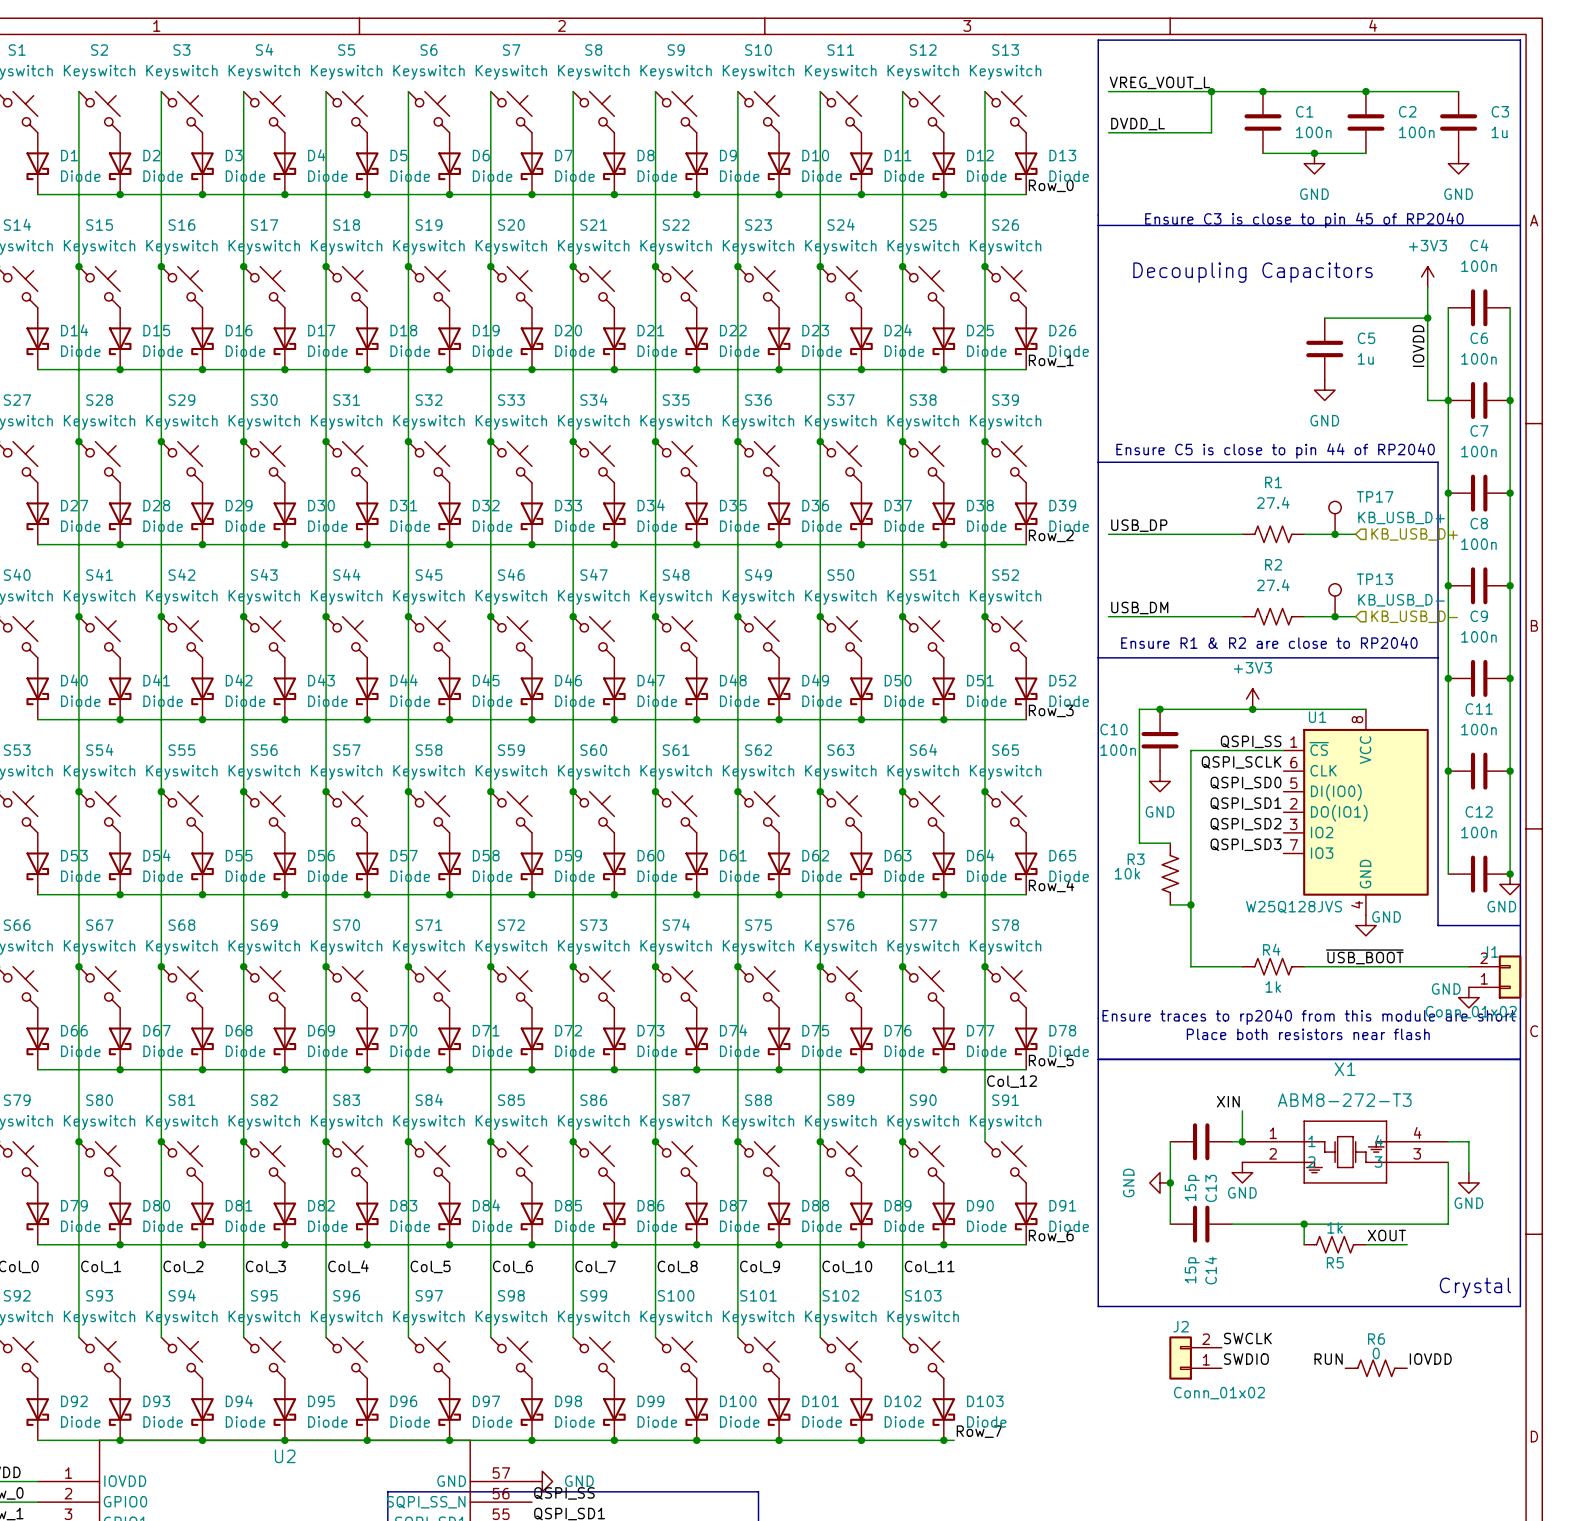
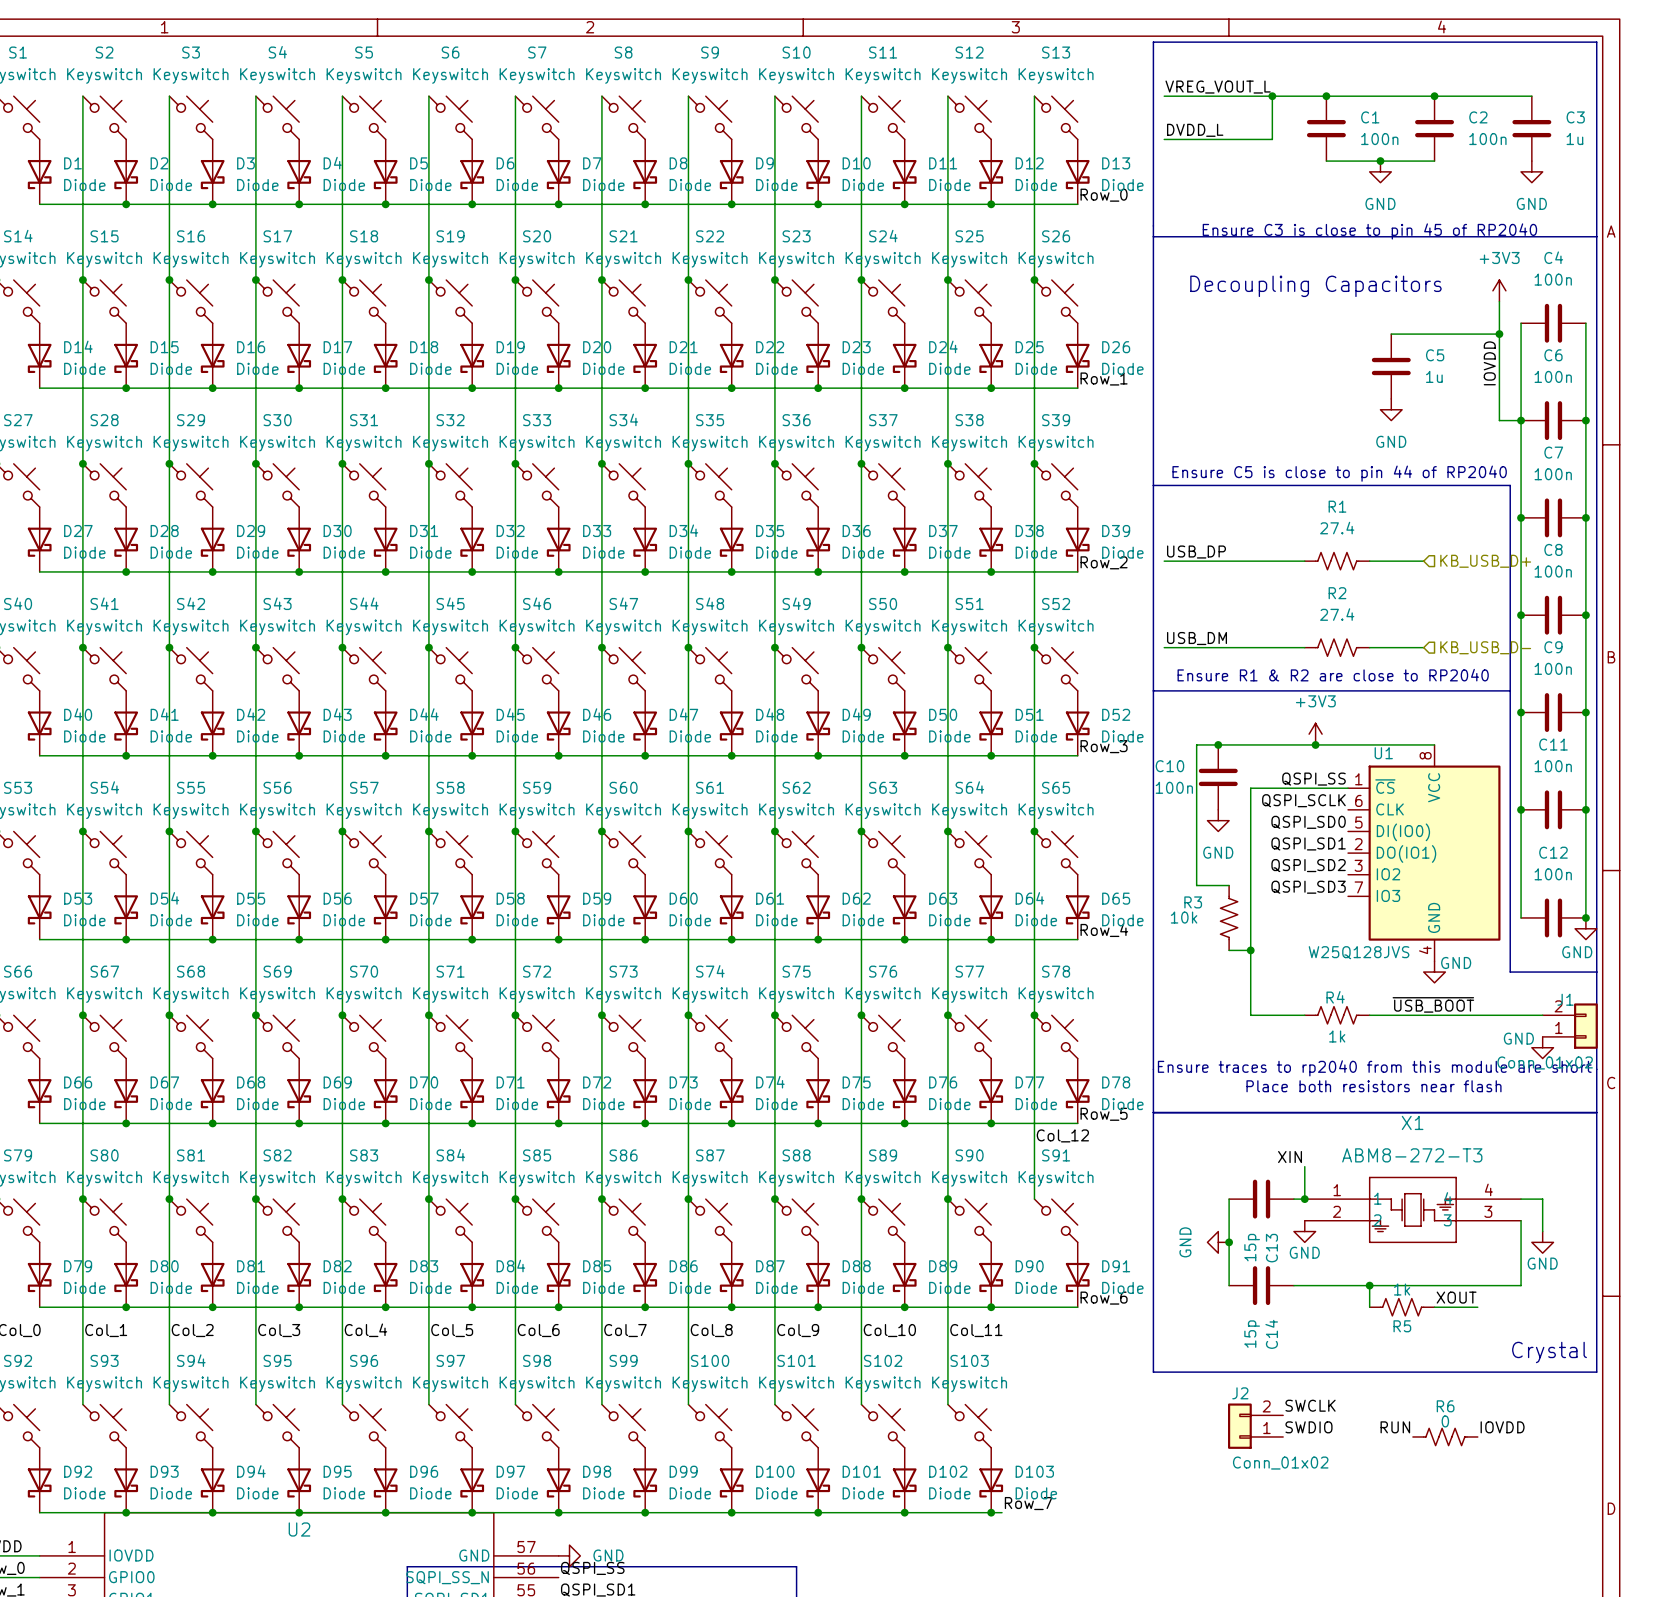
TP17: KB_USB_D+ (1335, 517) -> none
junction: (1335, 534) -> none
TP13: KB_USB_D- (1335, 600) -> none
junction: (1335, 616) -> none

